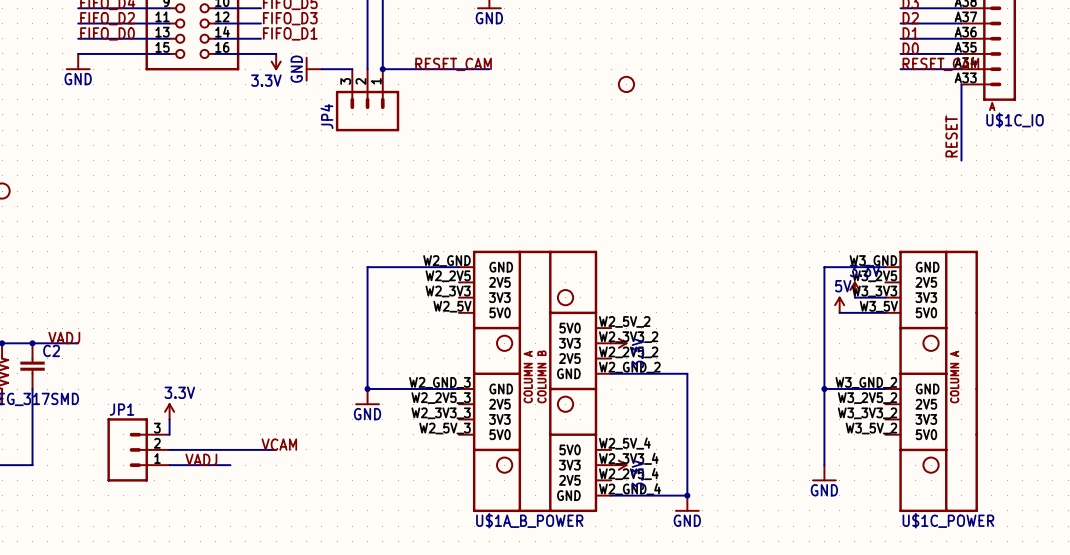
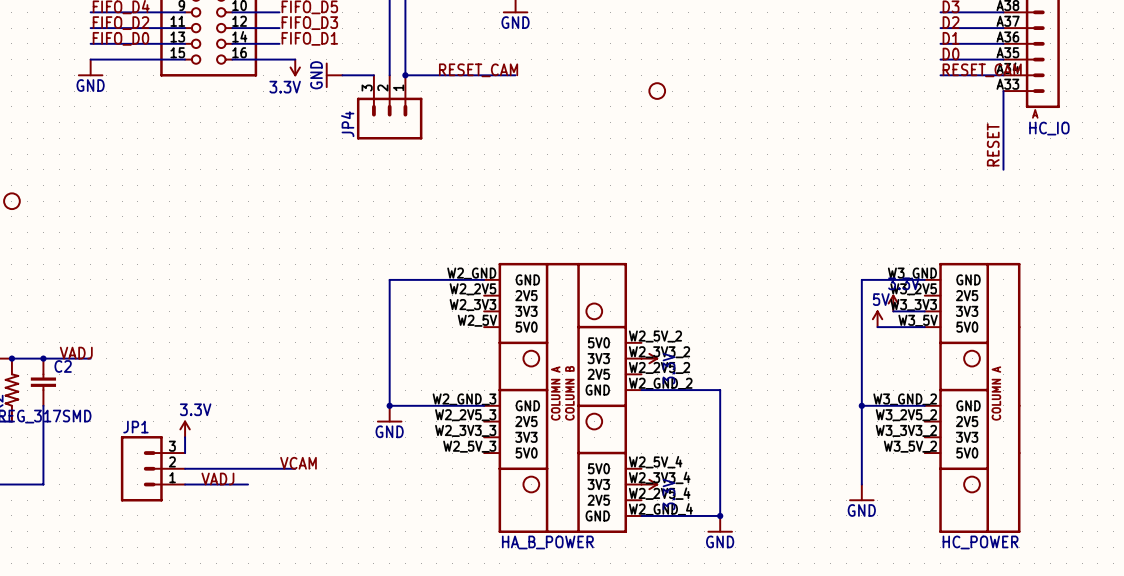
U$1C_IO name: U$1C_IO (1015, 120) -> HC_IO (1049, 128)
U$1A_B_POWER name: U$1A_B_POWER (529, 520) -> HA_B_POWER (547, 542)
U$1C_POWER name: U$1C_POWER (948, 520) -> HC_POWER (980, 542)

